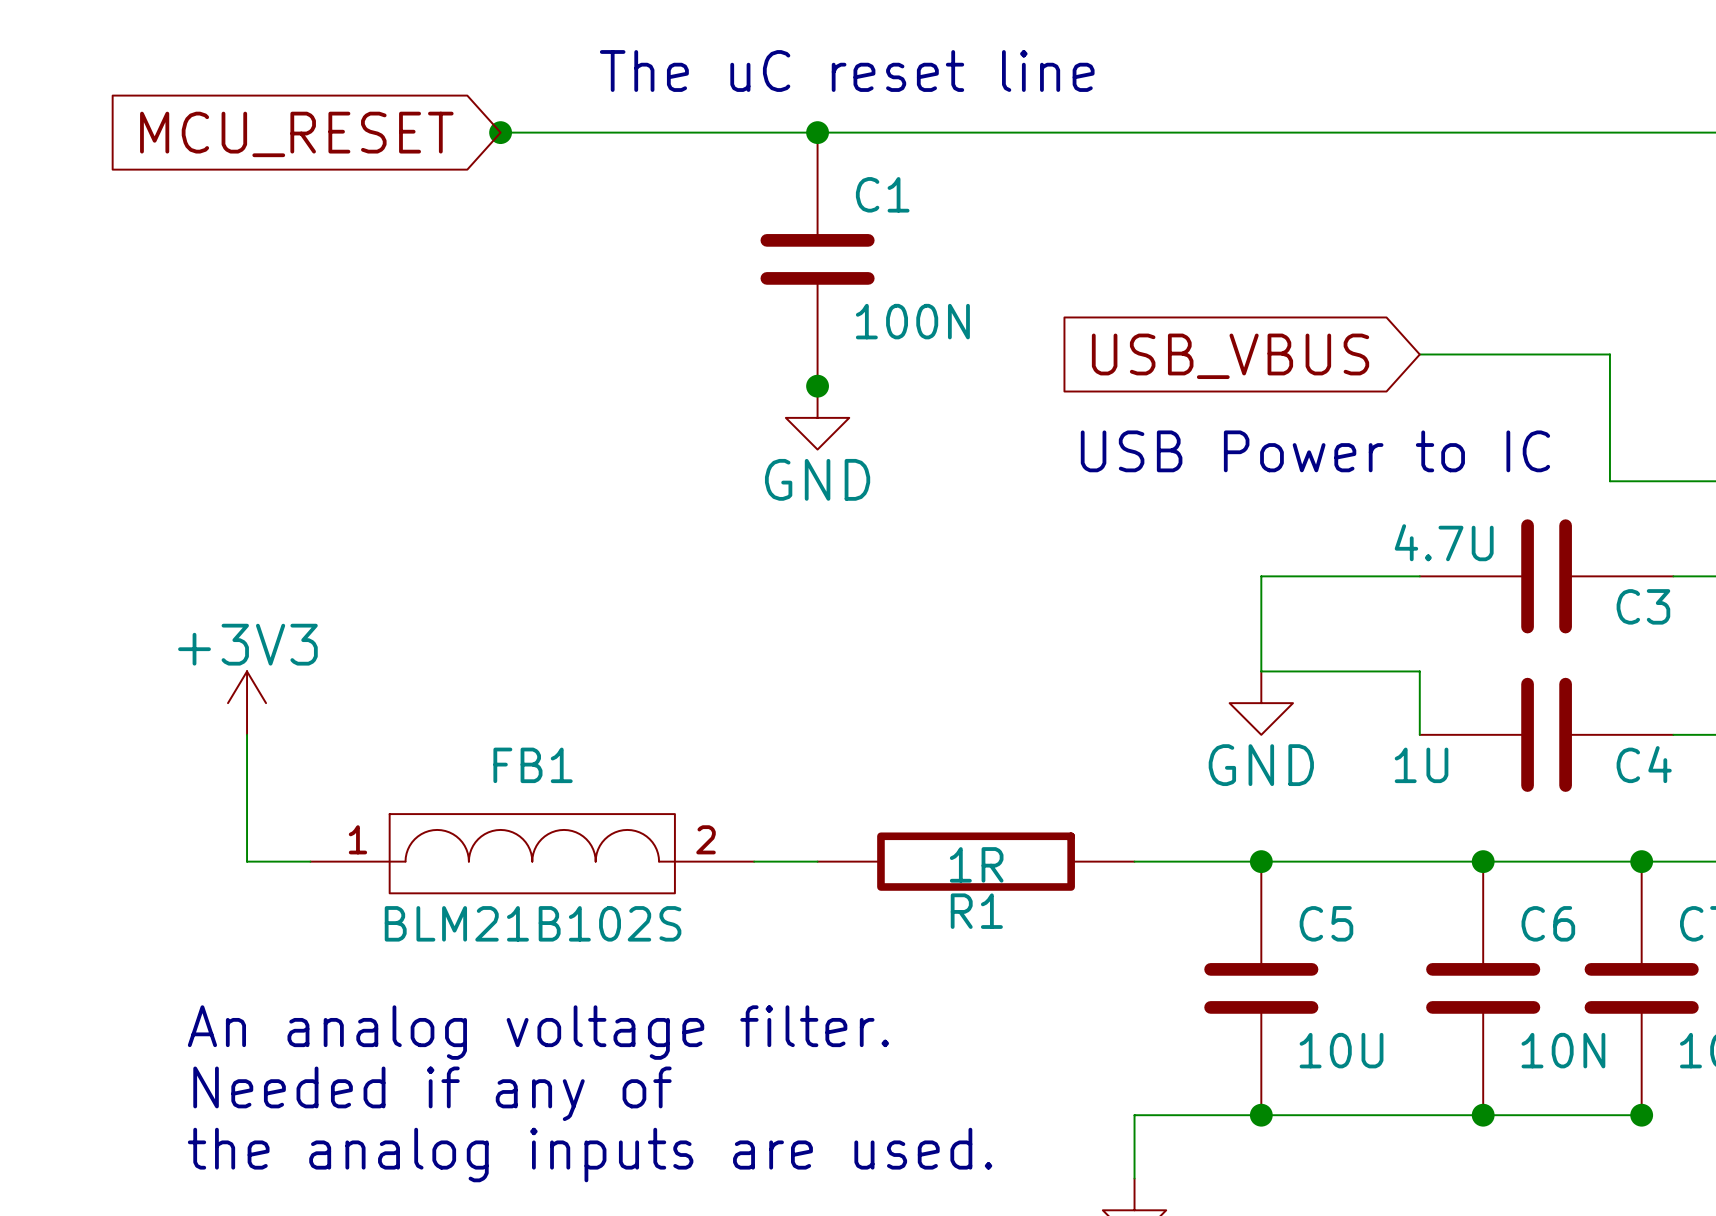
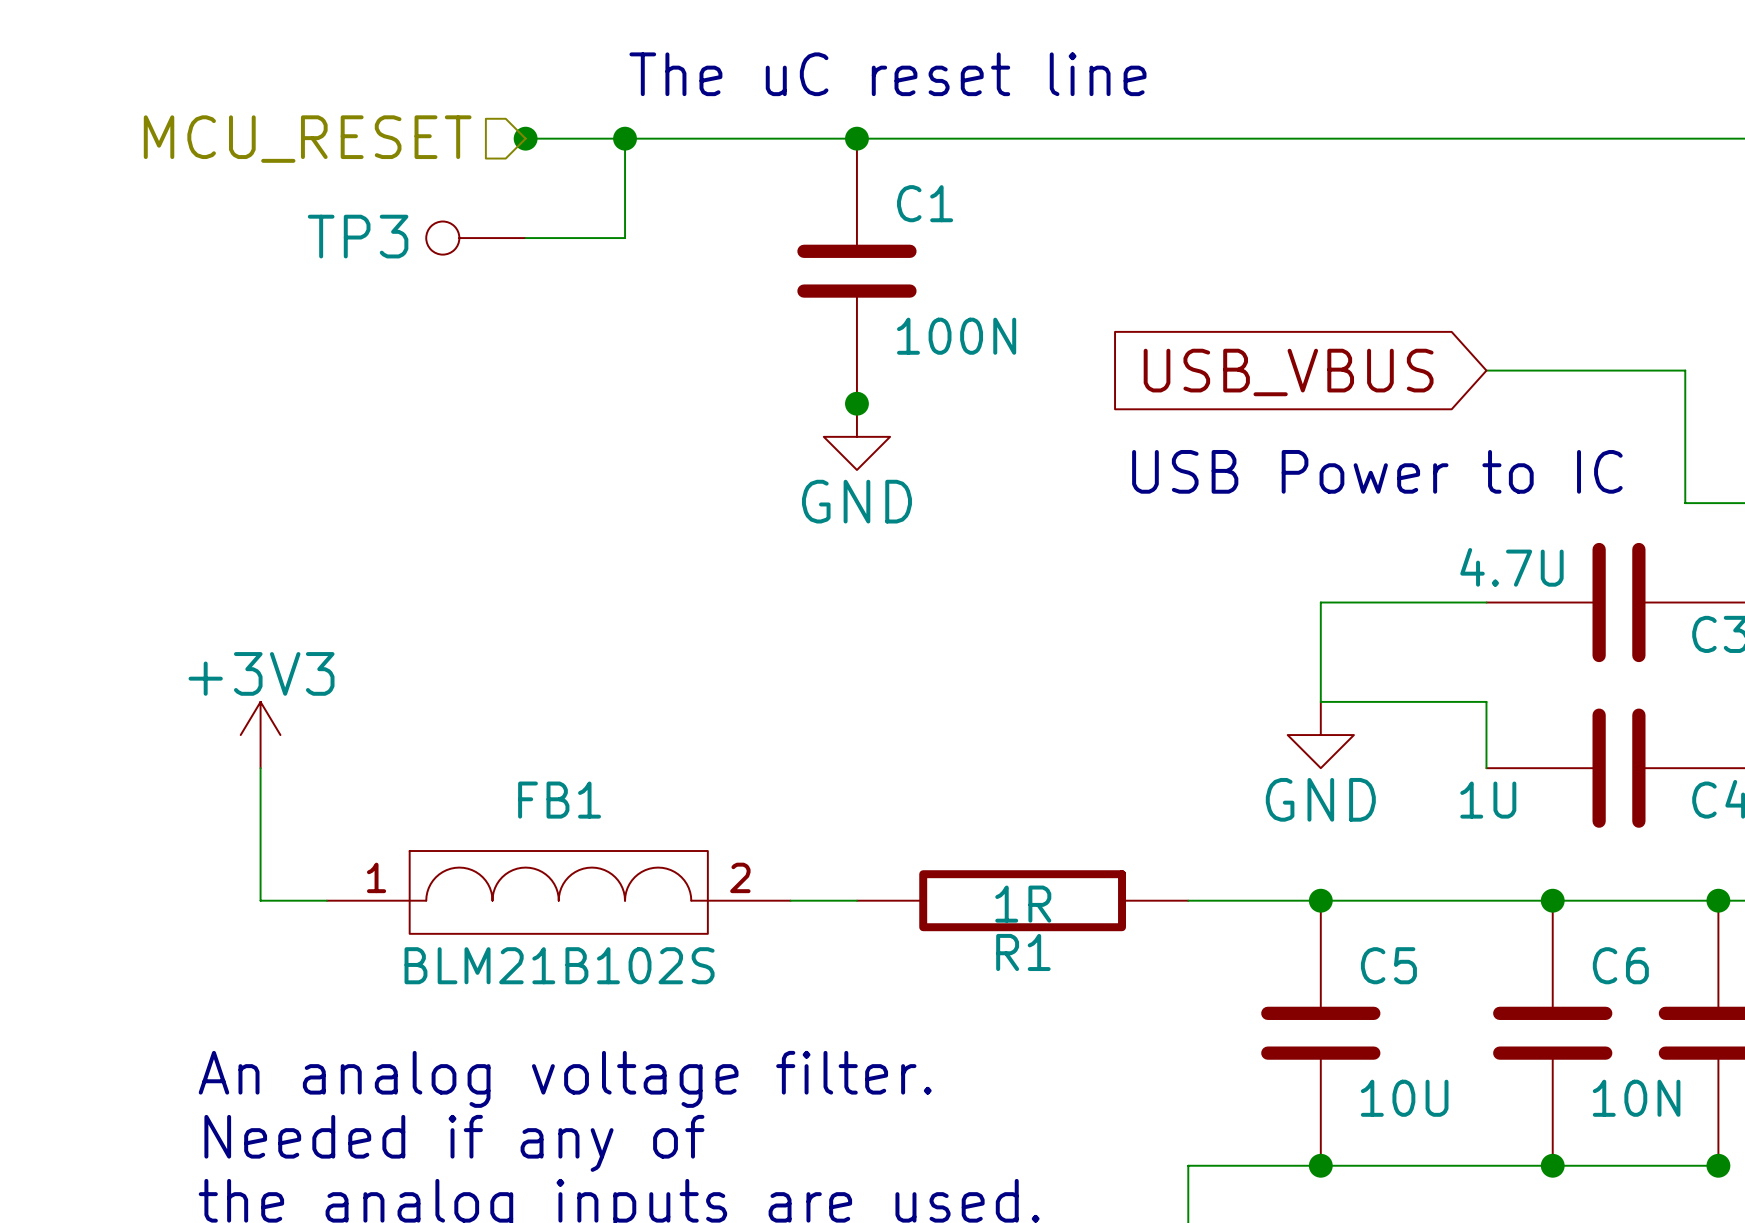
wire: none -> (625, 138) (625, 238) (525, 238)
junction: none -> (625, 138)
hierarchical label: none -> MCU_RESET (307, 139)
global label: MCU_RESET (296, 134) -> none
TP3: none -> (475, 238)

